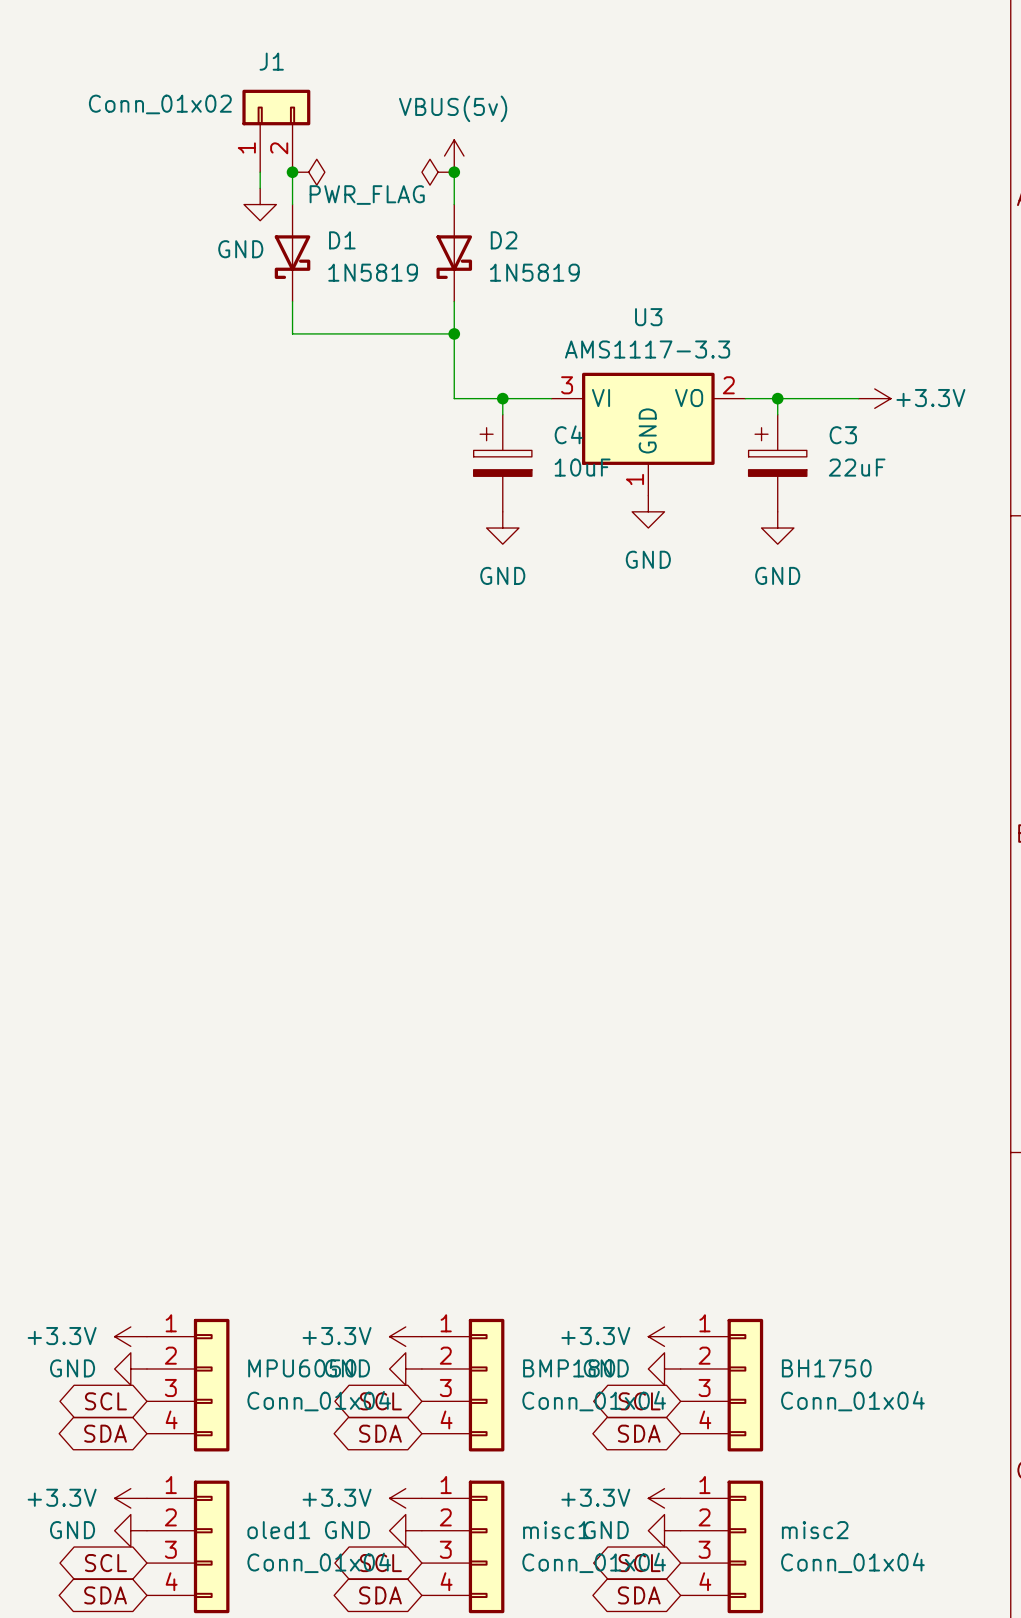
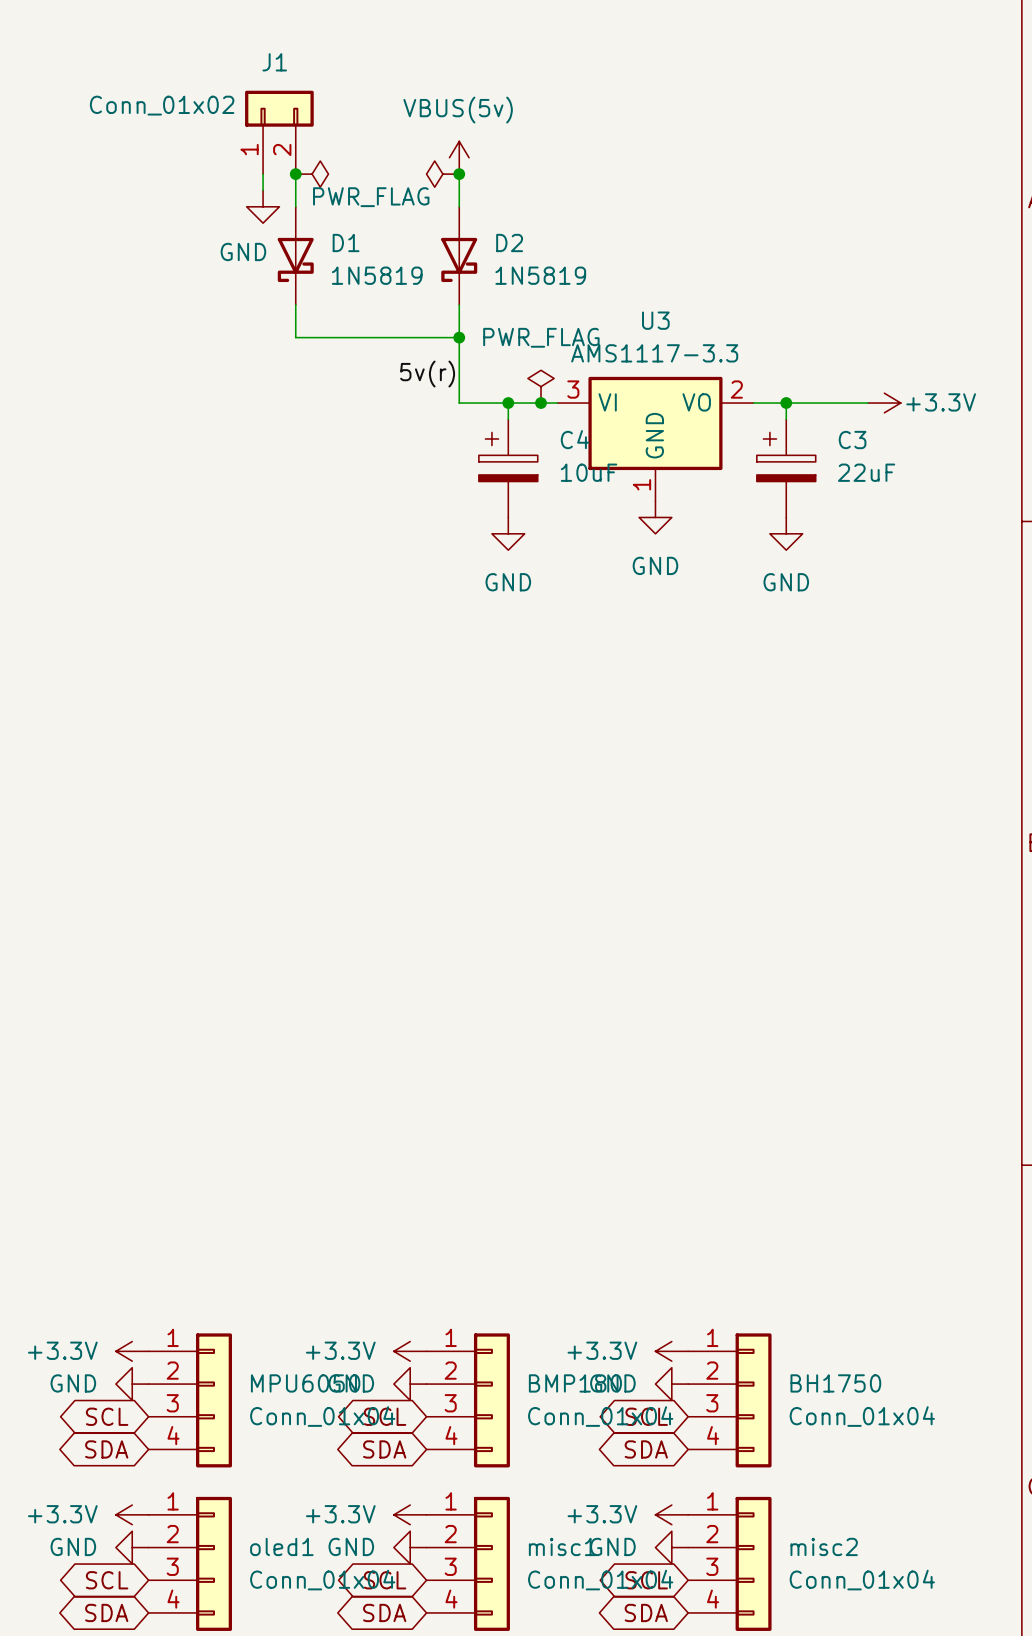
label: none -> 5v(r) (427, 374)
power symbol: none -> PWR_FLAG (541, 386)
junction: none -> (541, 403)

